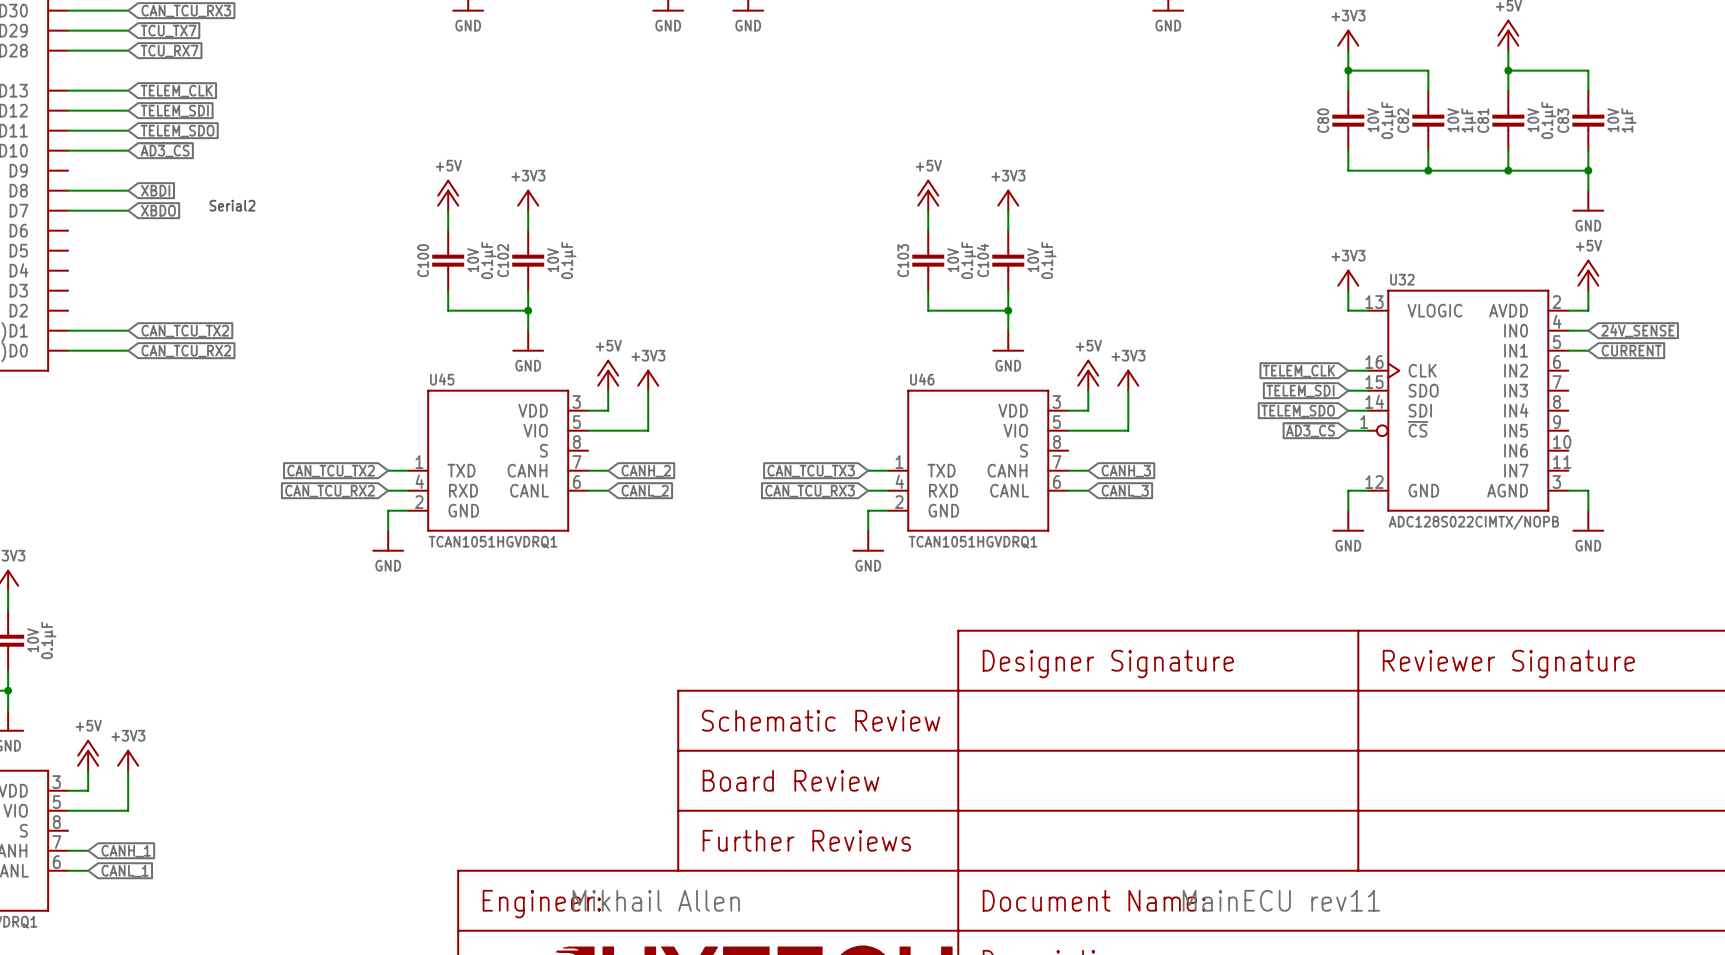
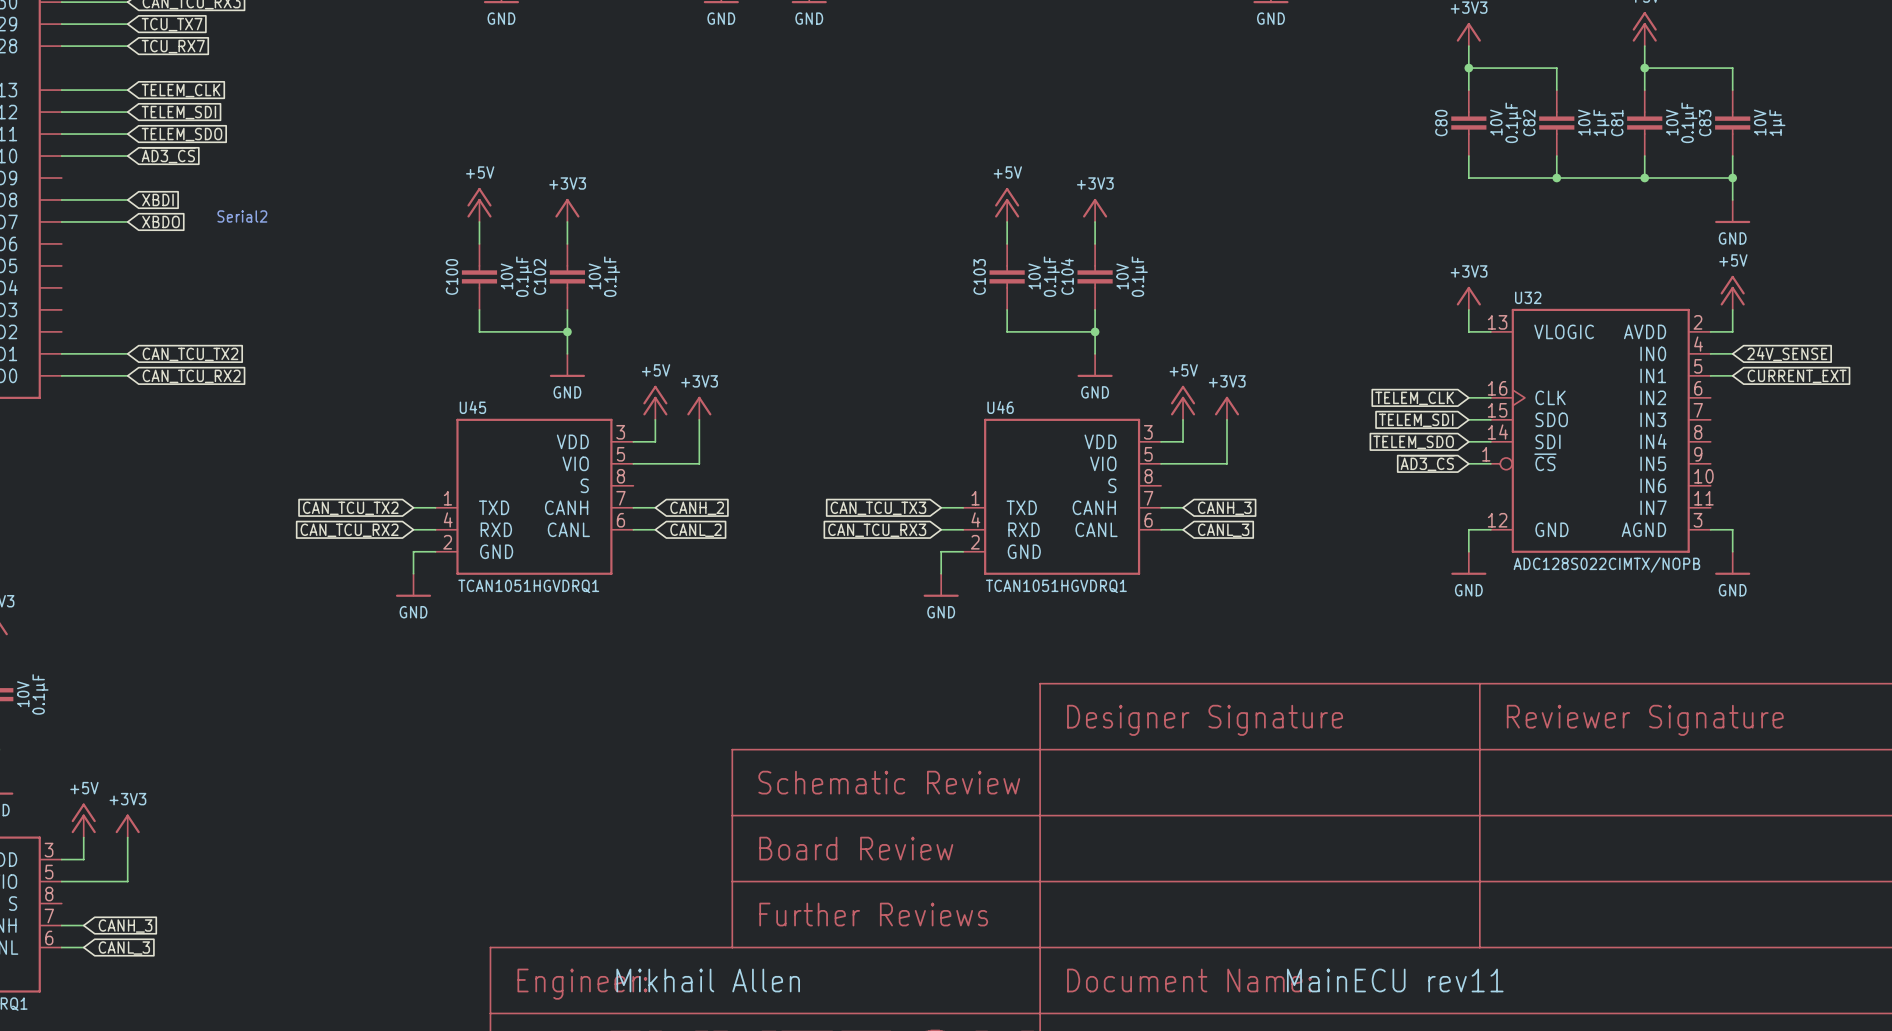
global label: CURRENT (1631, 350) -> CURRENT_EXT (1797, 376)
global label: CANH_1 (126, 851) -> CANH_3 (125, 926)
global label: CANL_1 (125, 871) -> CANL_3 (124, 948)

